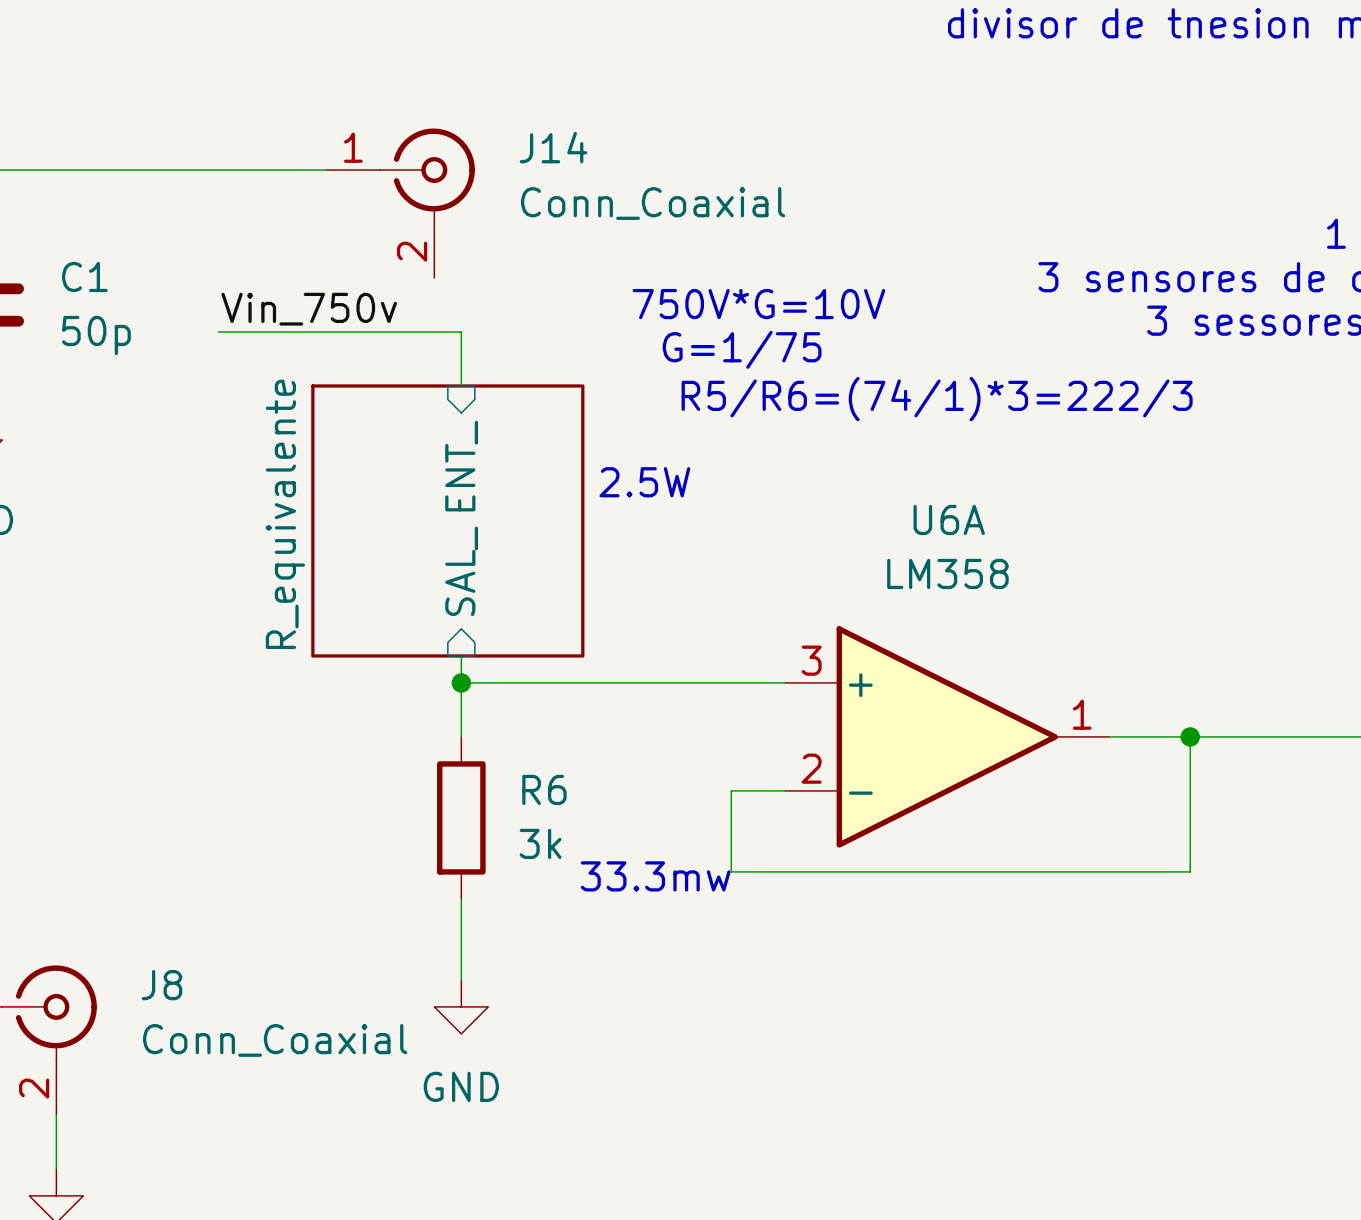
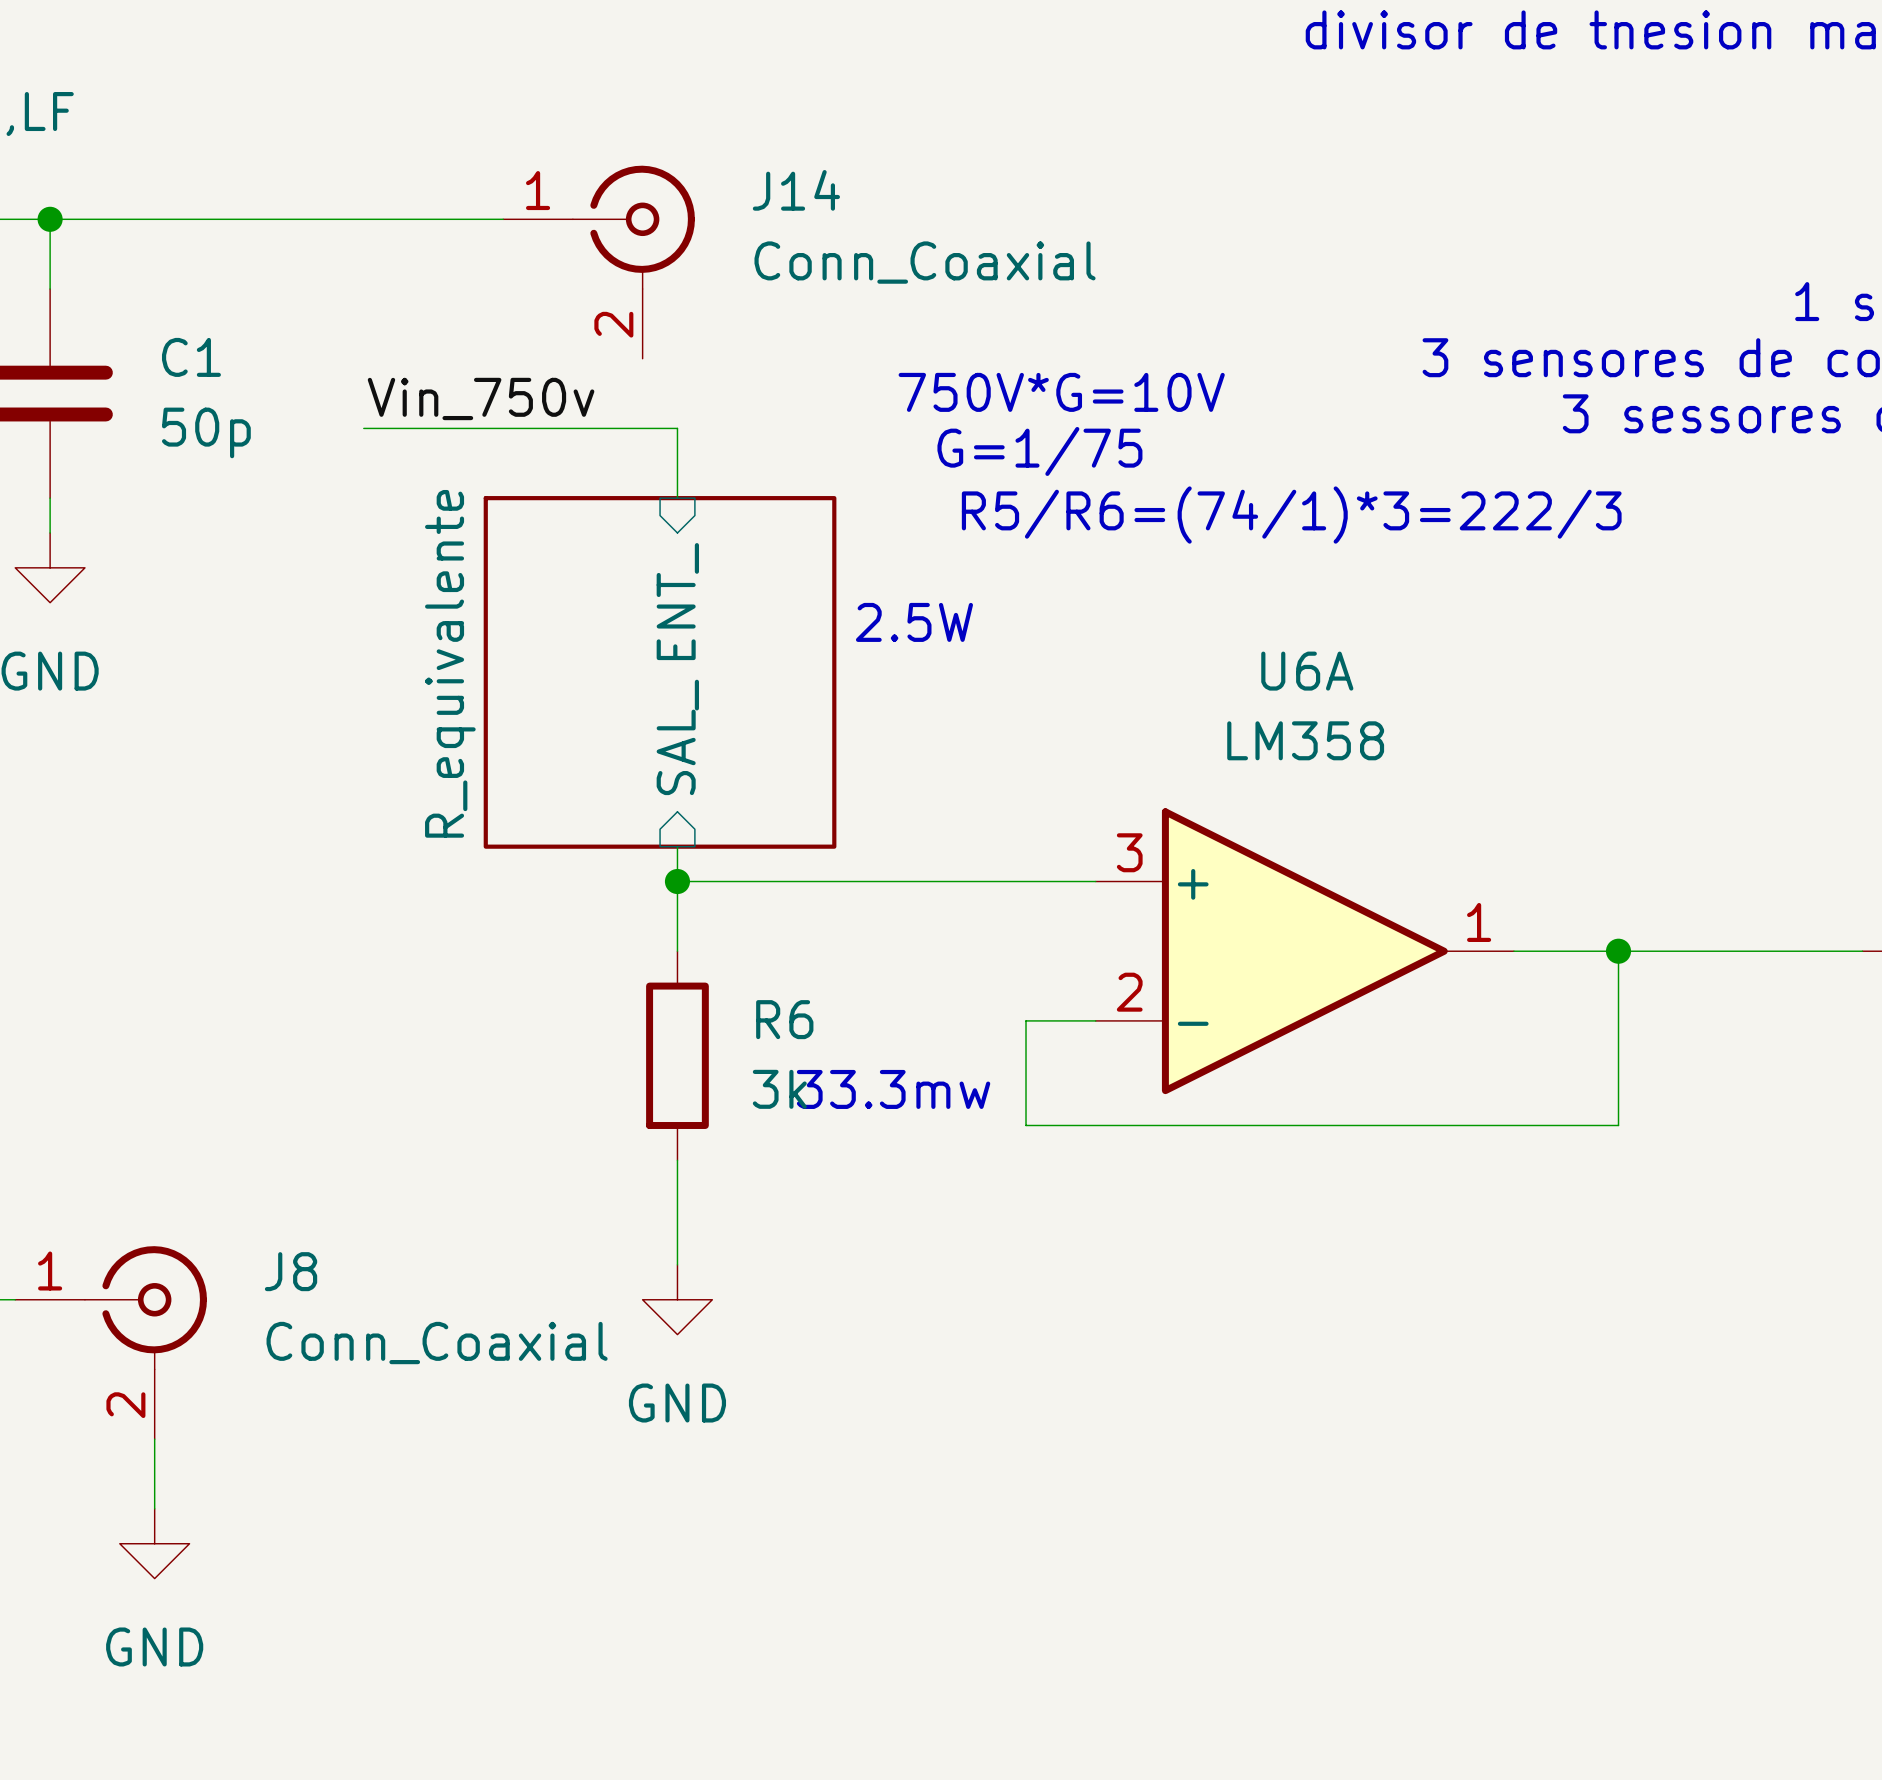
text position: 33.3mw (655, 876) -> 33.3mw (893, 1089)

